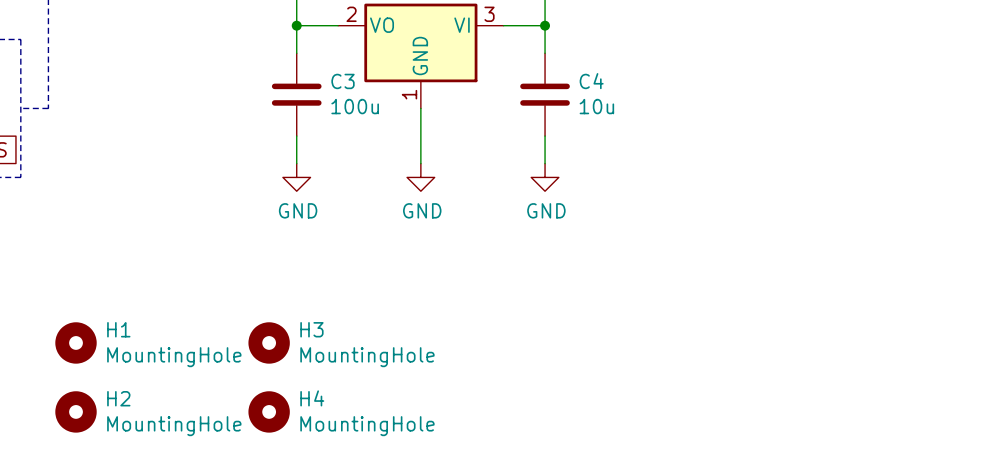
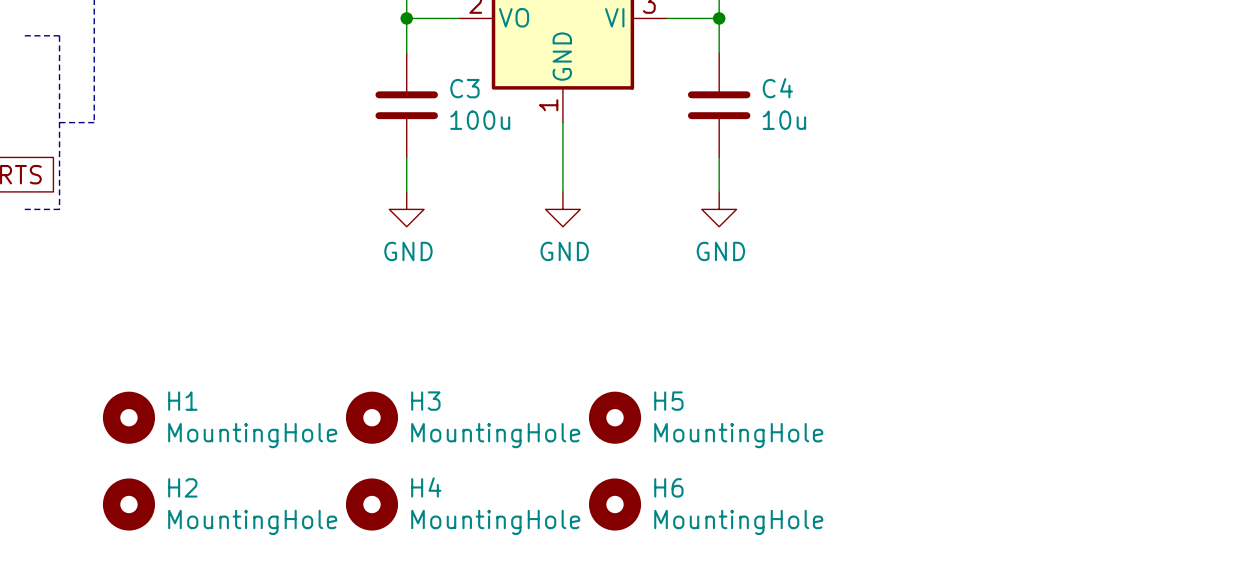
H5: none -> MountingHole (615, 417)
H6: none -> MountingHole (615, 504)

